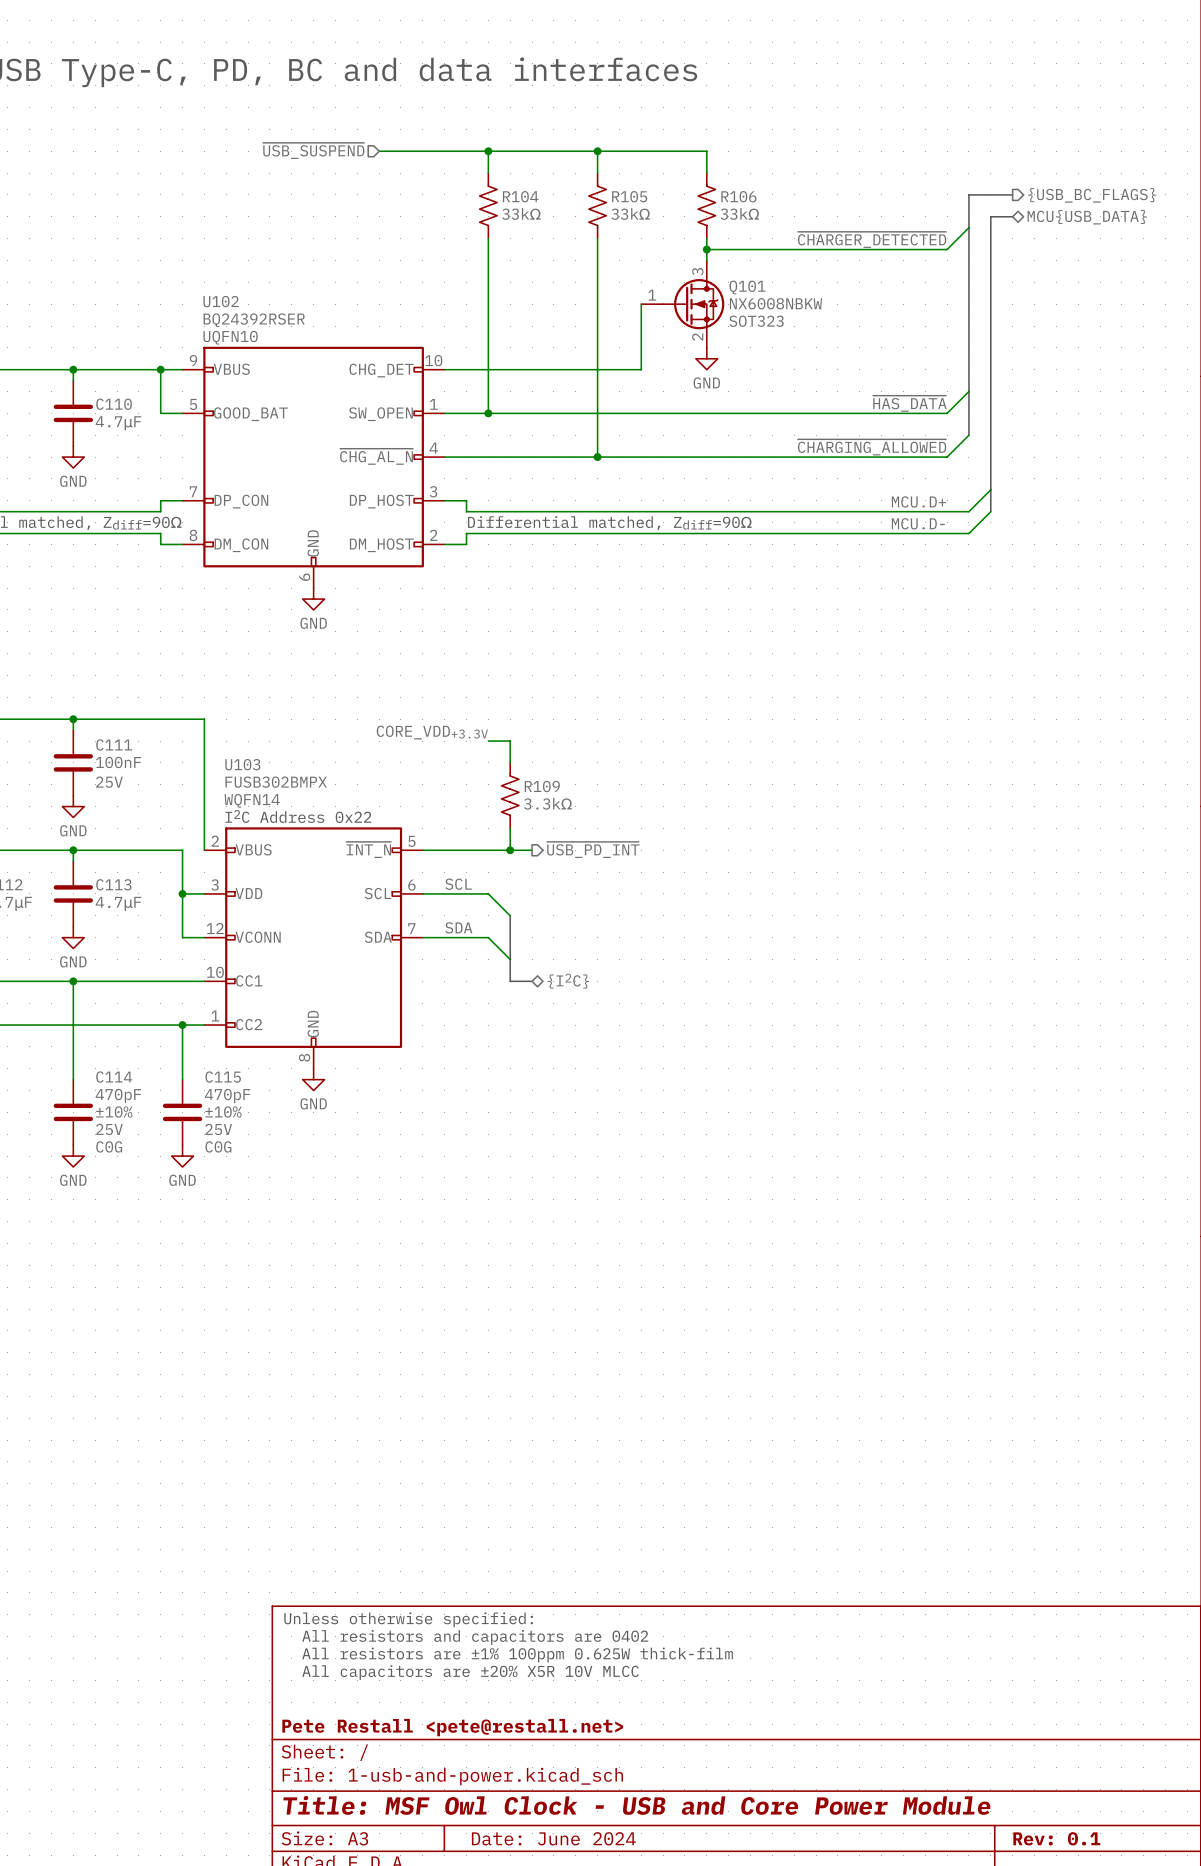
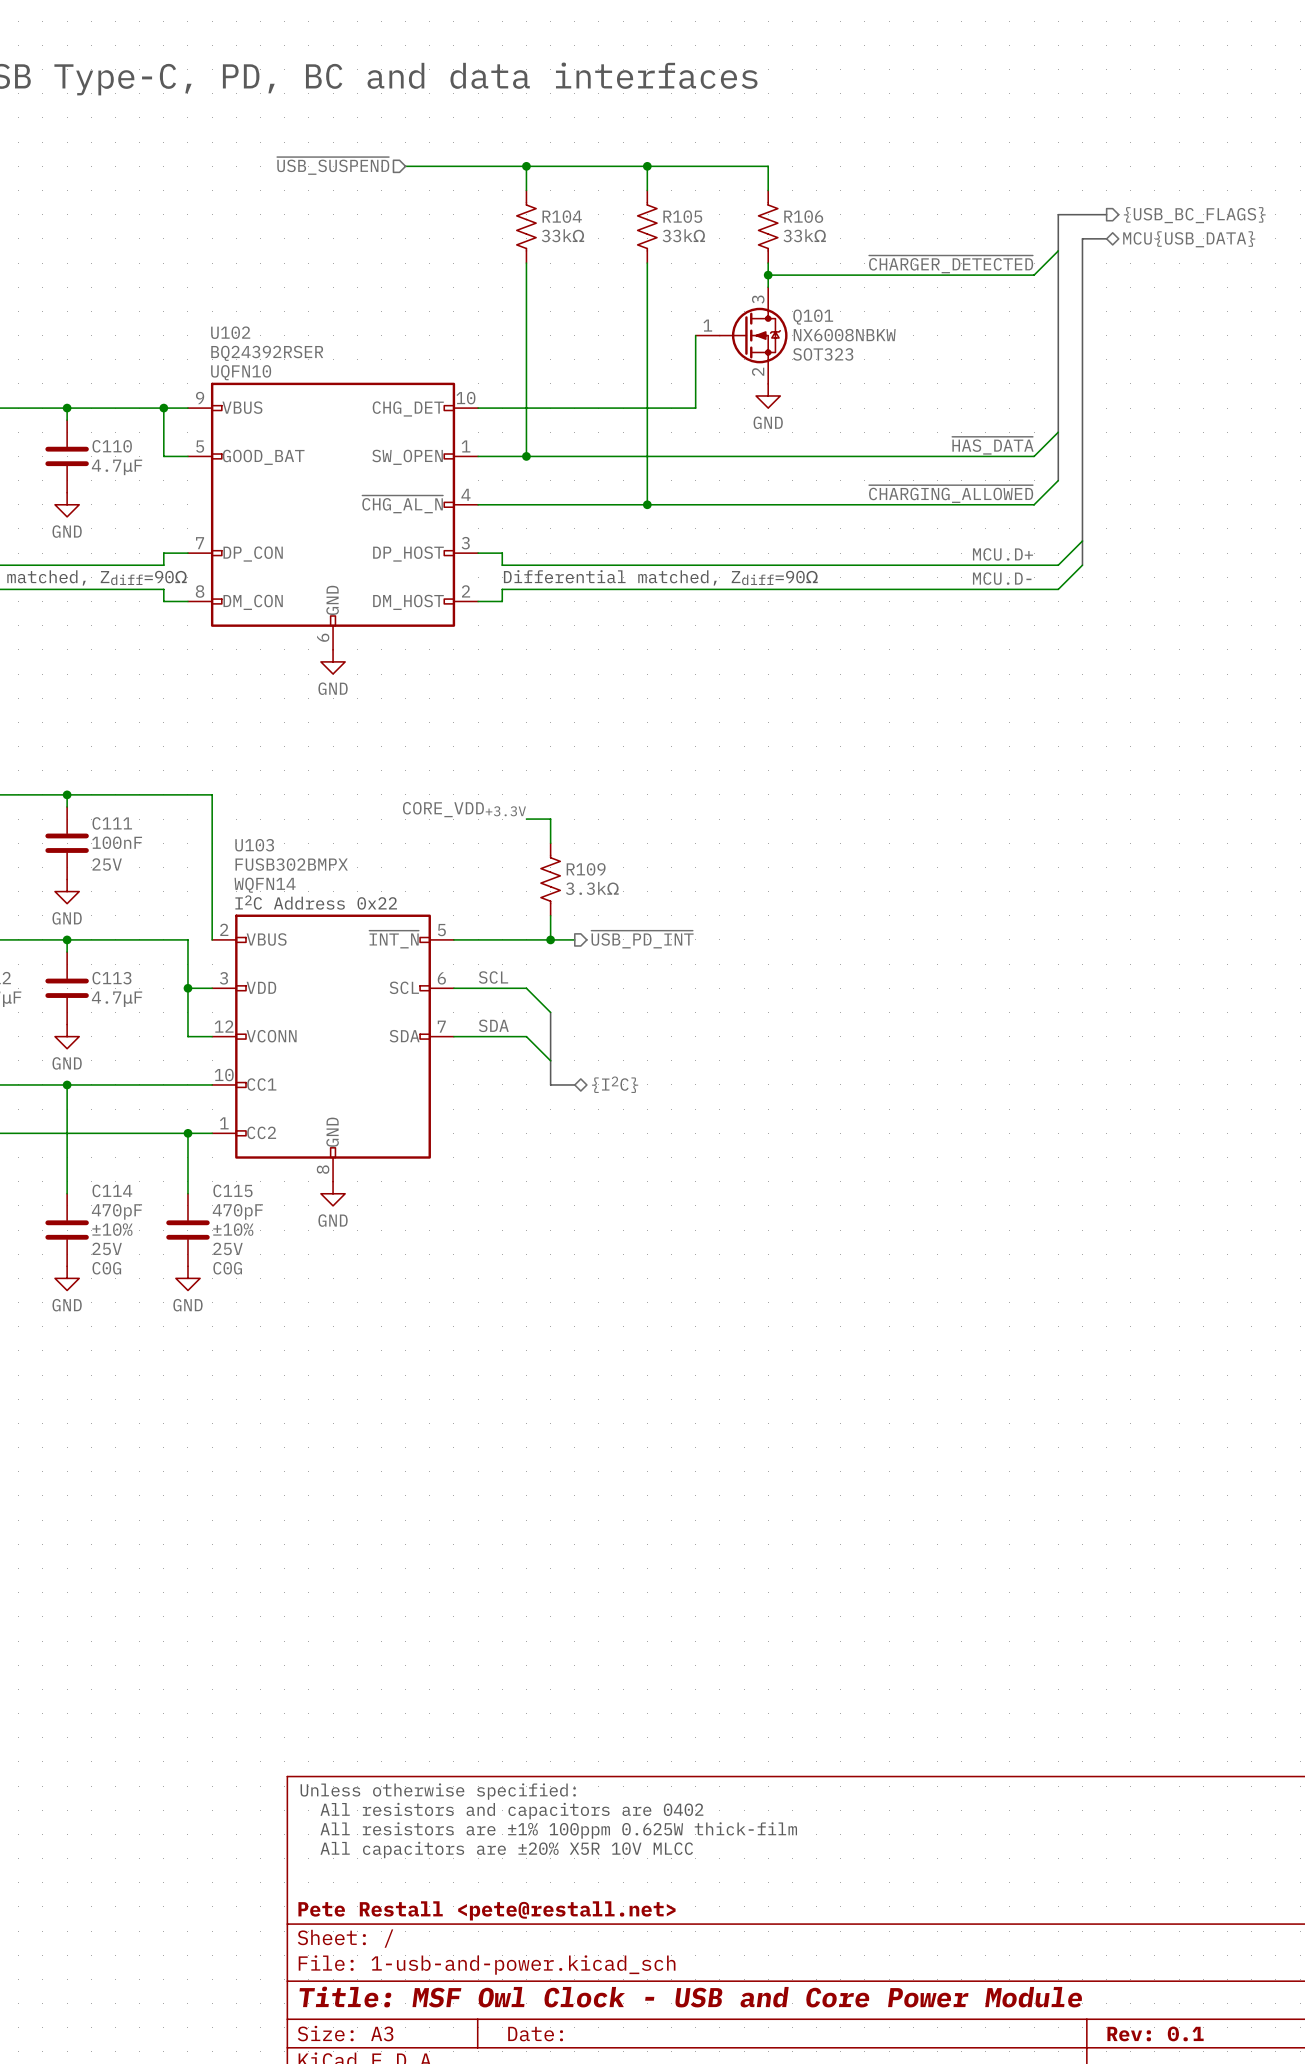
title block: Date: June 2024 (553, 1838) -> Date: (535, 2034)

